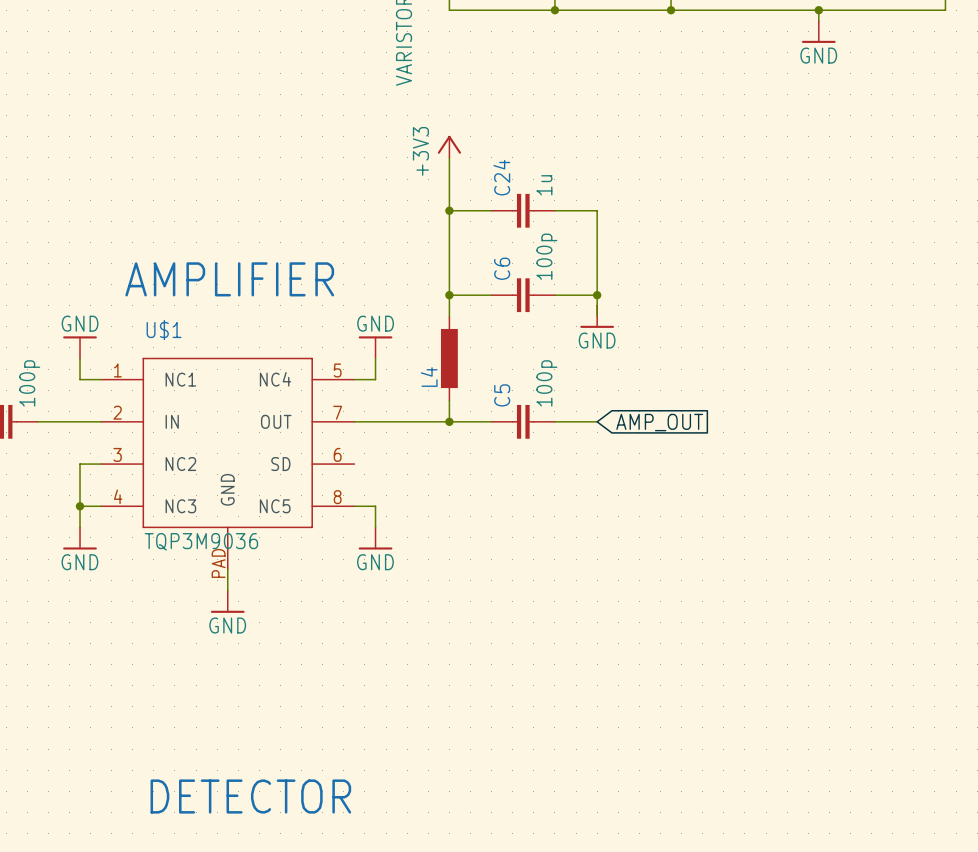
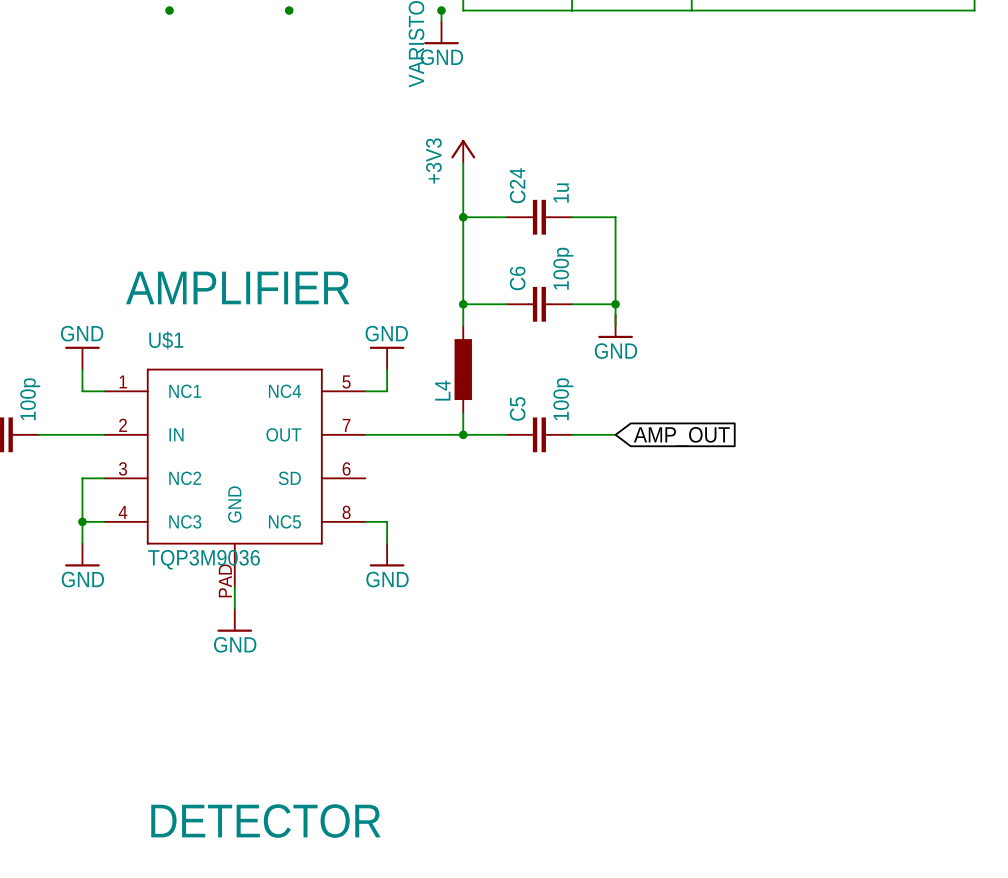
junction: none -> (169, 10)
junction: none -> (289, 10)
wire: none -> (441, 10) (441, 21)
junction: none -> (441, 10)
junction: (554, 10) -> none
junction: (671, 10) -> none
wire: (818, 10) (818, 20) -> none
junction: (818, 10) -> none
power symbol: none -> GND (441, 32)
power symbol: GND (818, 31) -> none

